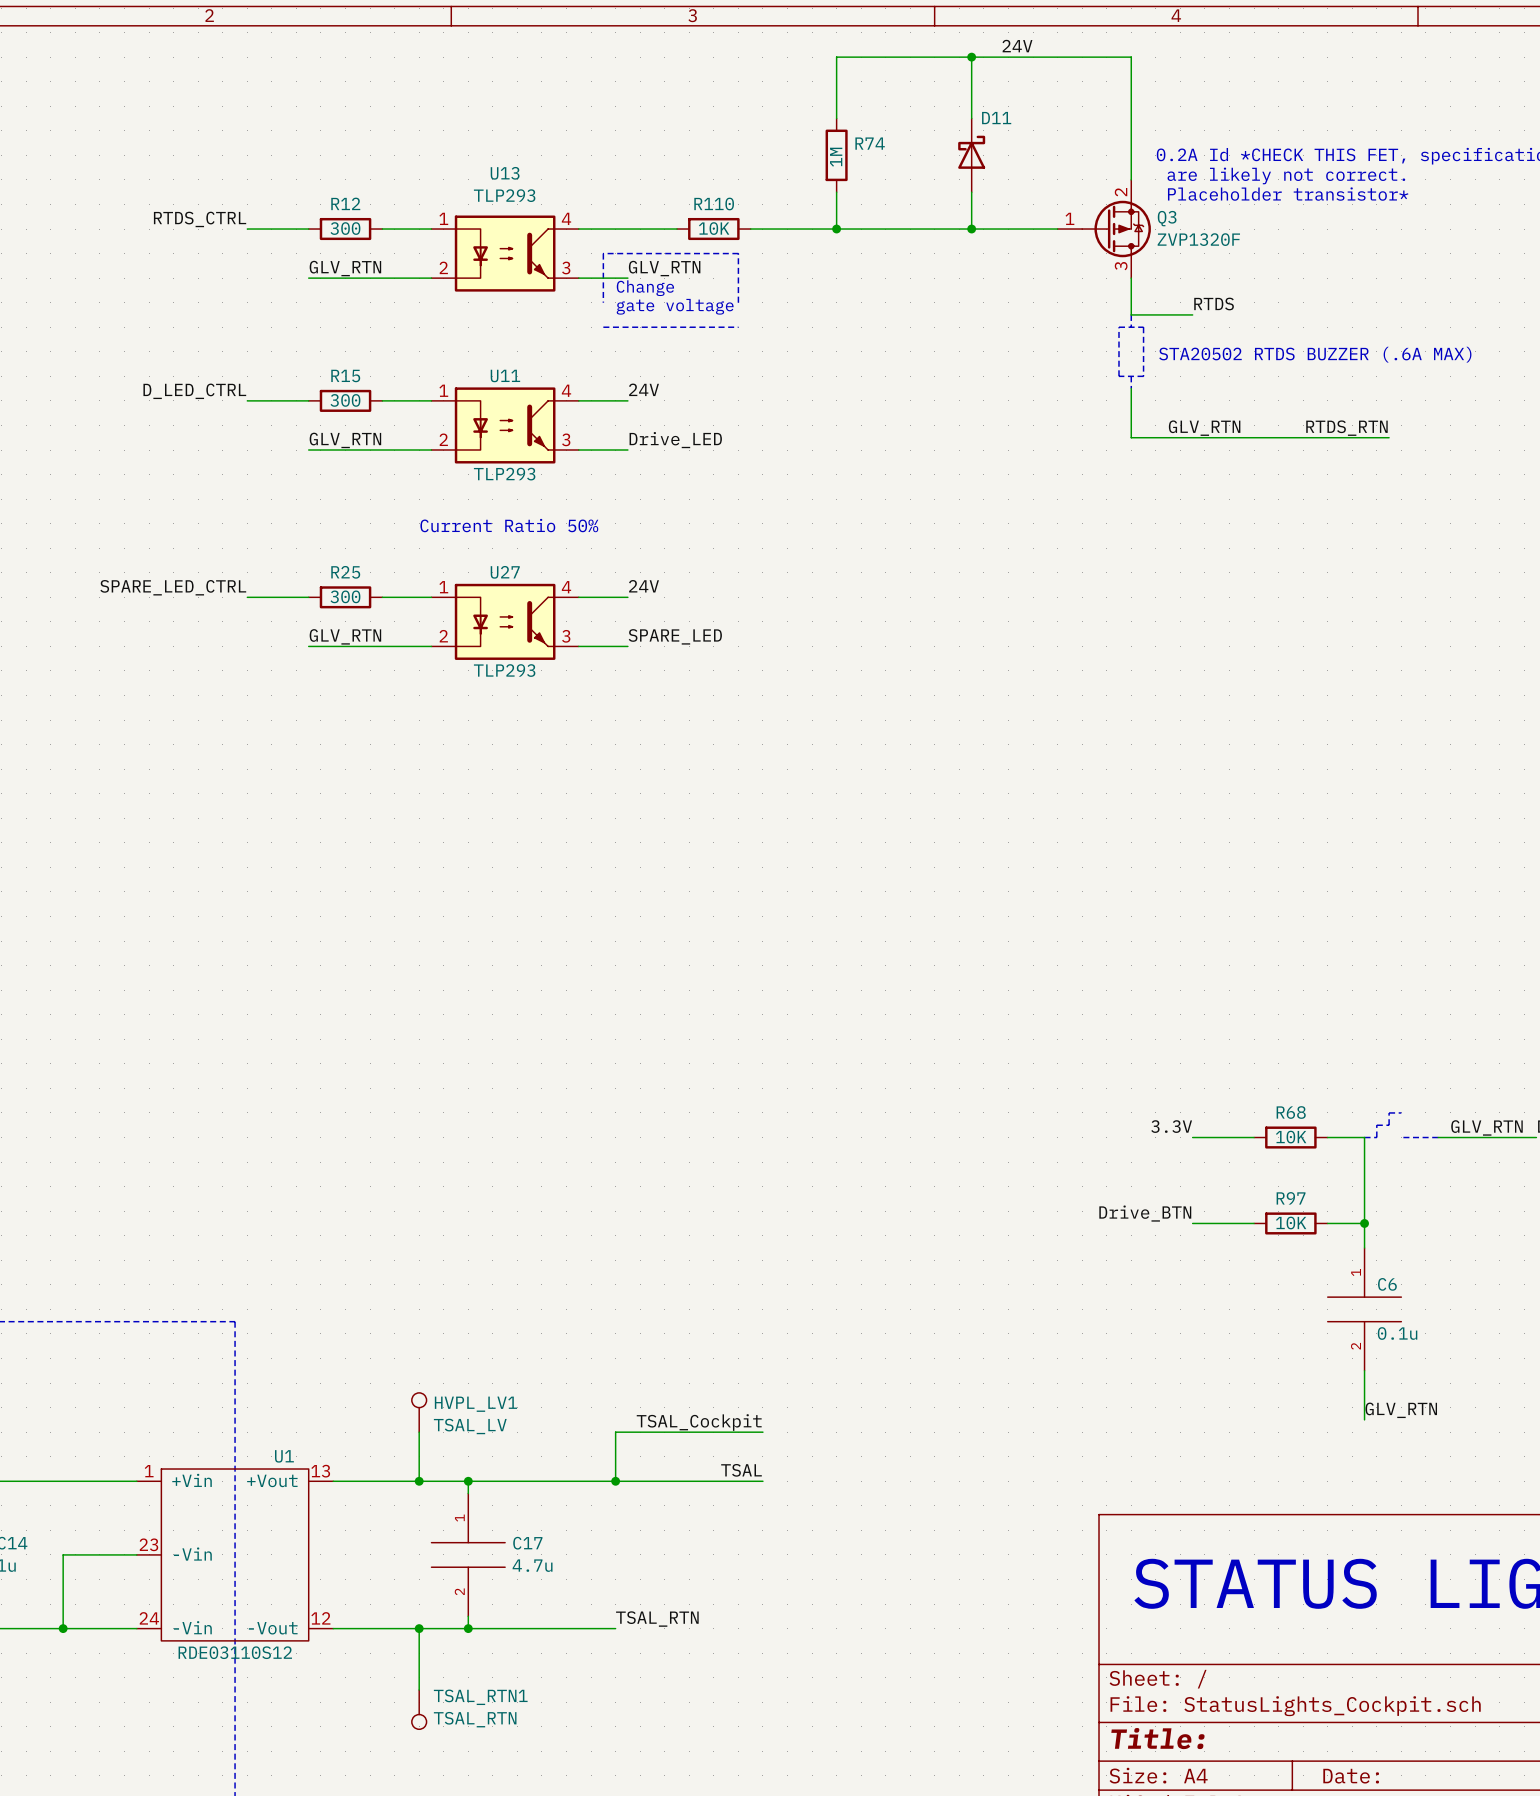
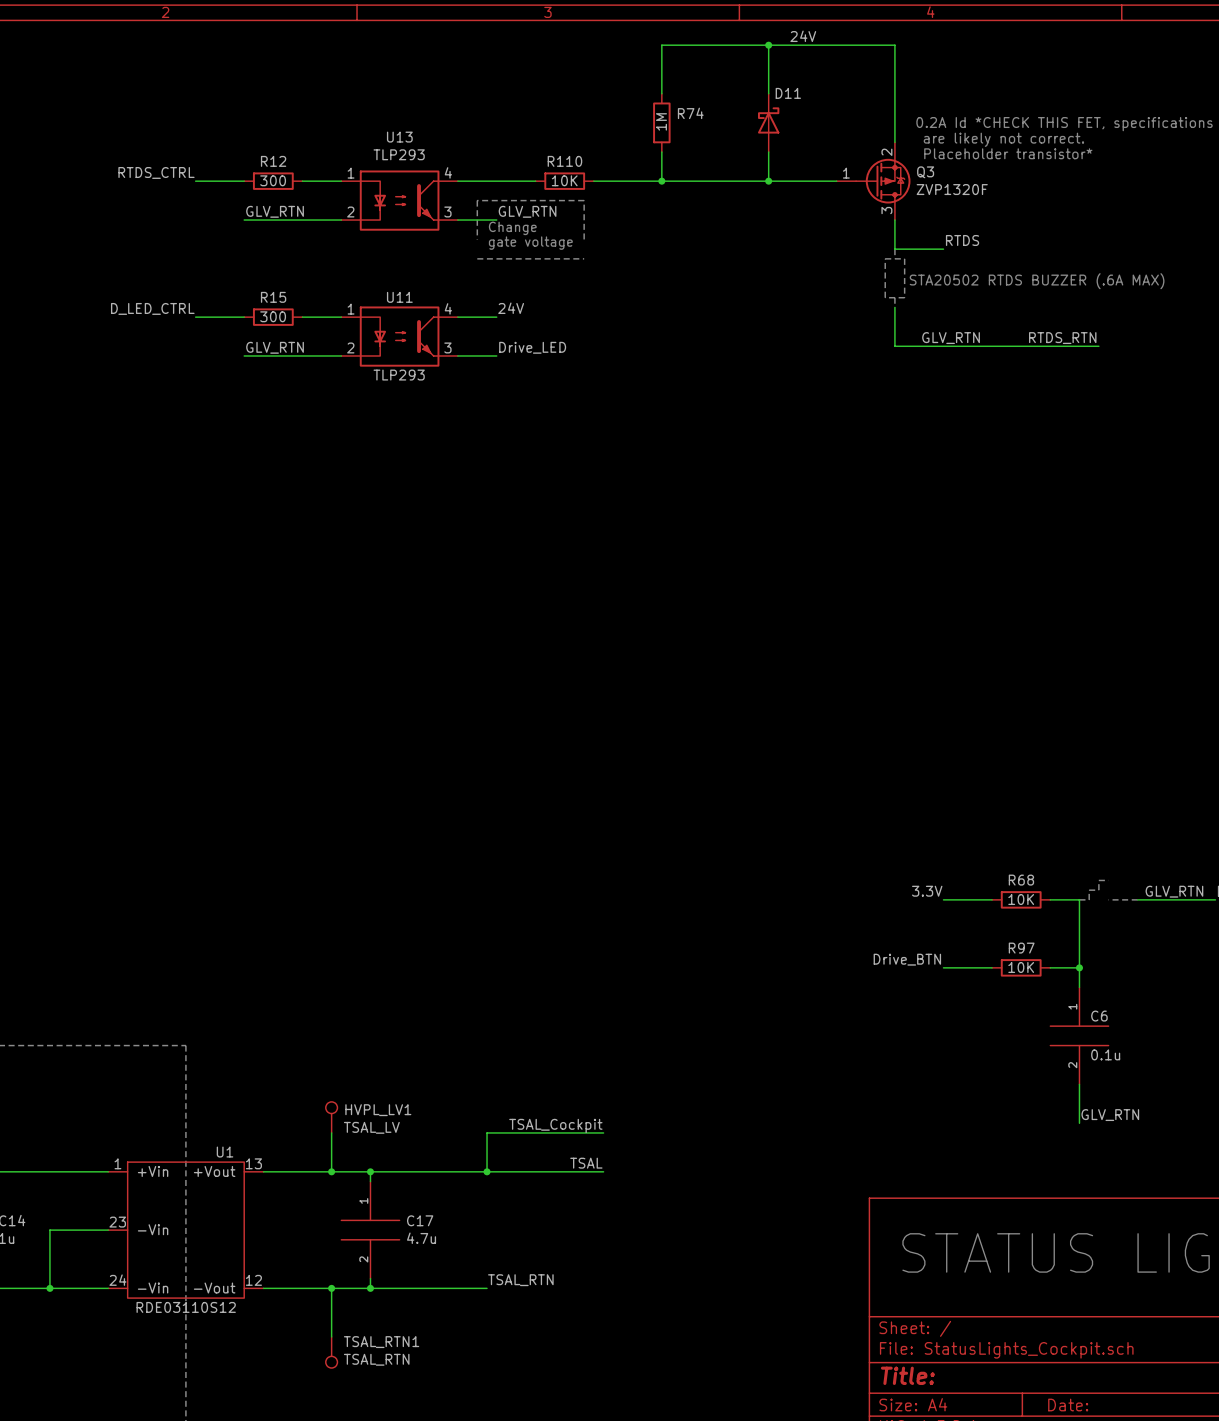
text: Current Ratio 50% (509, 525) -> none
label: 24V (643, 586) -> none
label: SPARE_LED_CTRL (173, 587) -> none
wire: (247, 597) (308, 597) -> none
R25: 300 (345, 597) -> none
wire: (382, 597) (431, 597) -> none
wire: (578, 597) (627, 597) -> none
U27: TLP293 (505, 621) -> none
label: GLV_RTN (345, 636) -> none
label: SPARE_LED (675, 636) -> none
wire: (308, 646) (431, 646) -> none
wire: (578, 646) (627, 646) -> none

